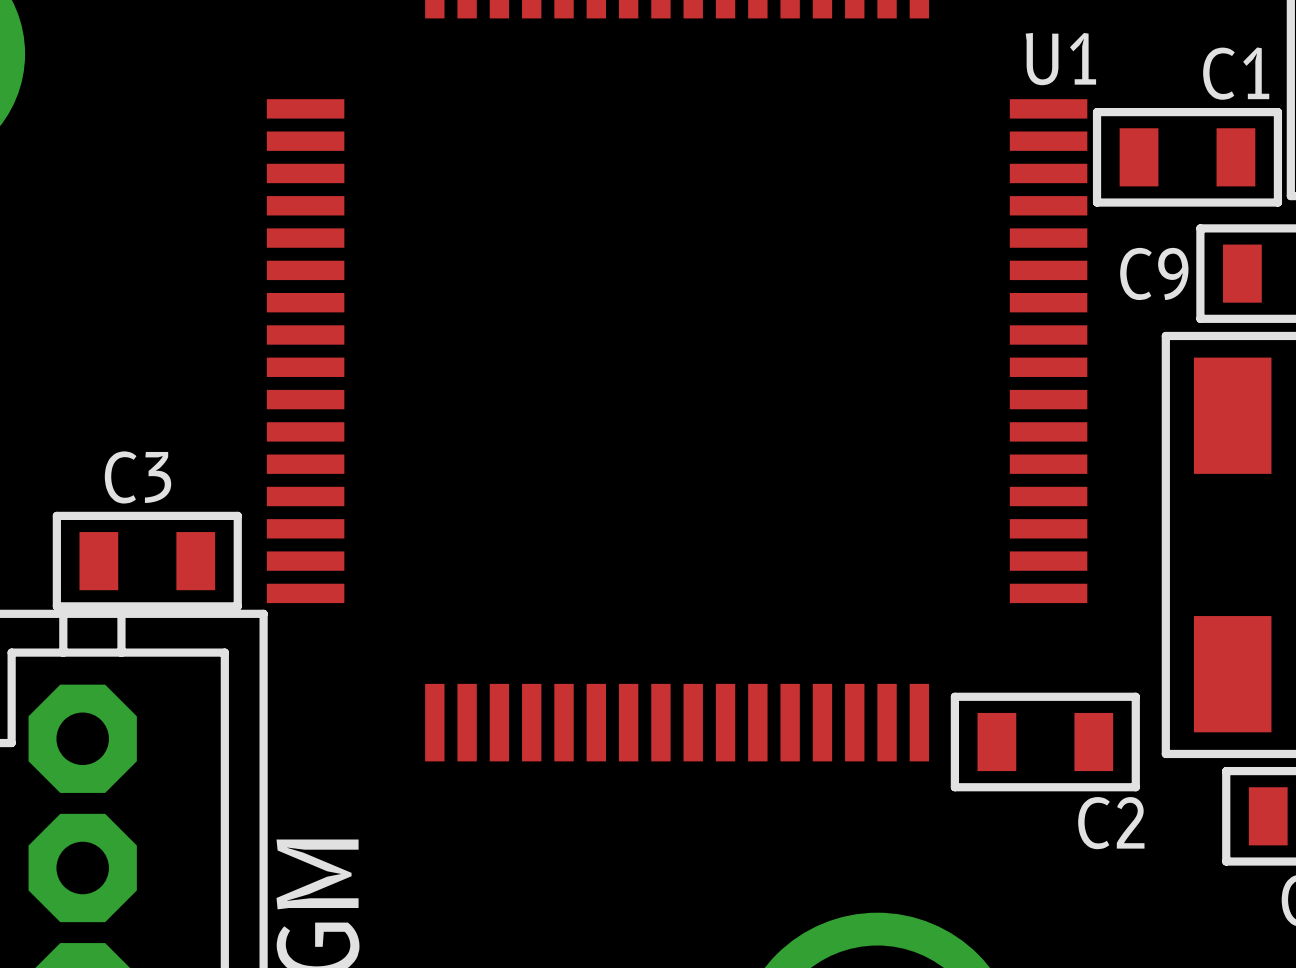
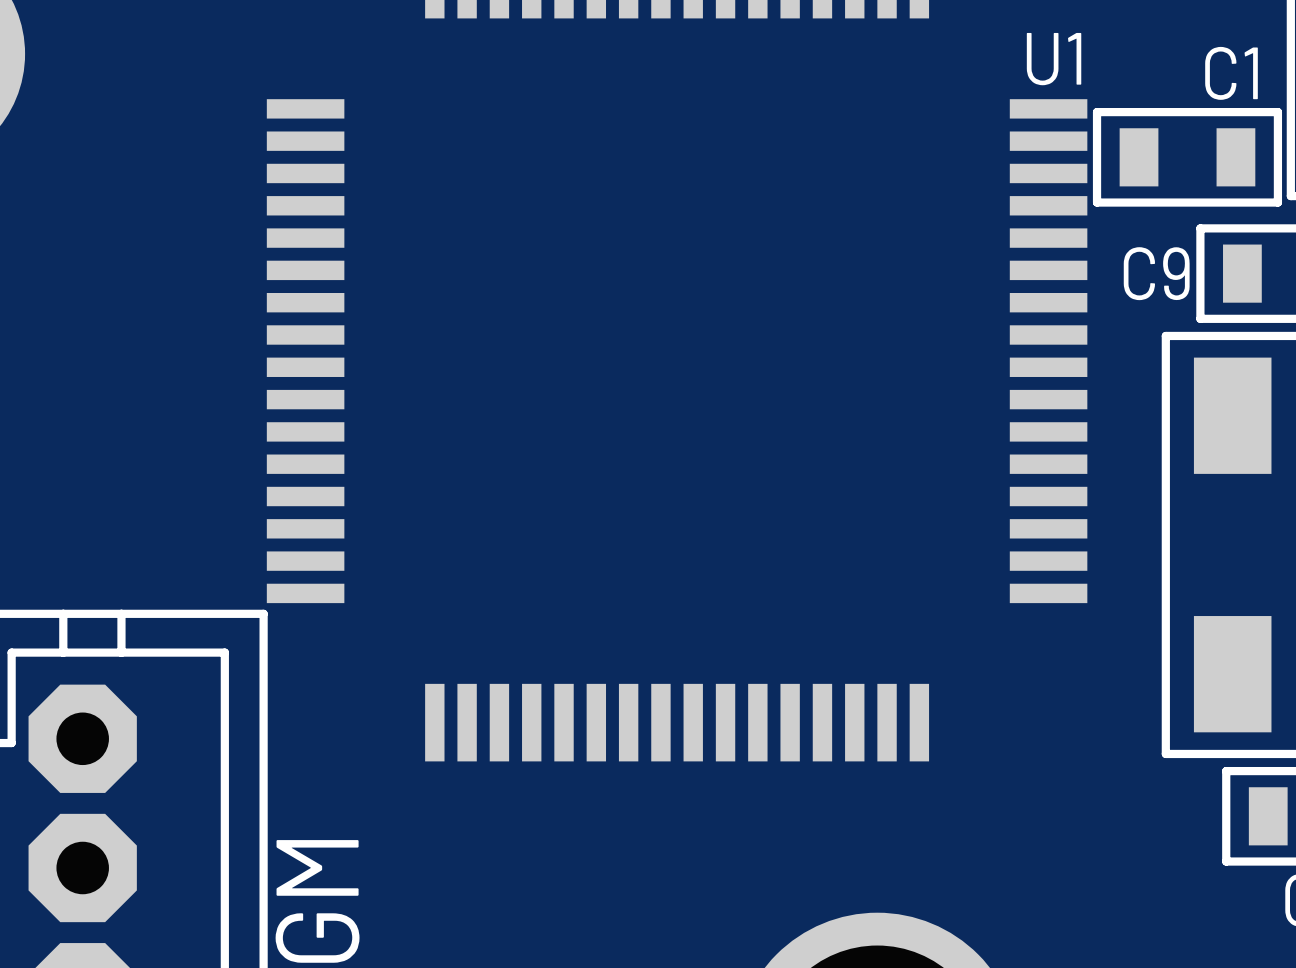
C3: (147, 561) -> none
C2: (1045, 742) -> none

